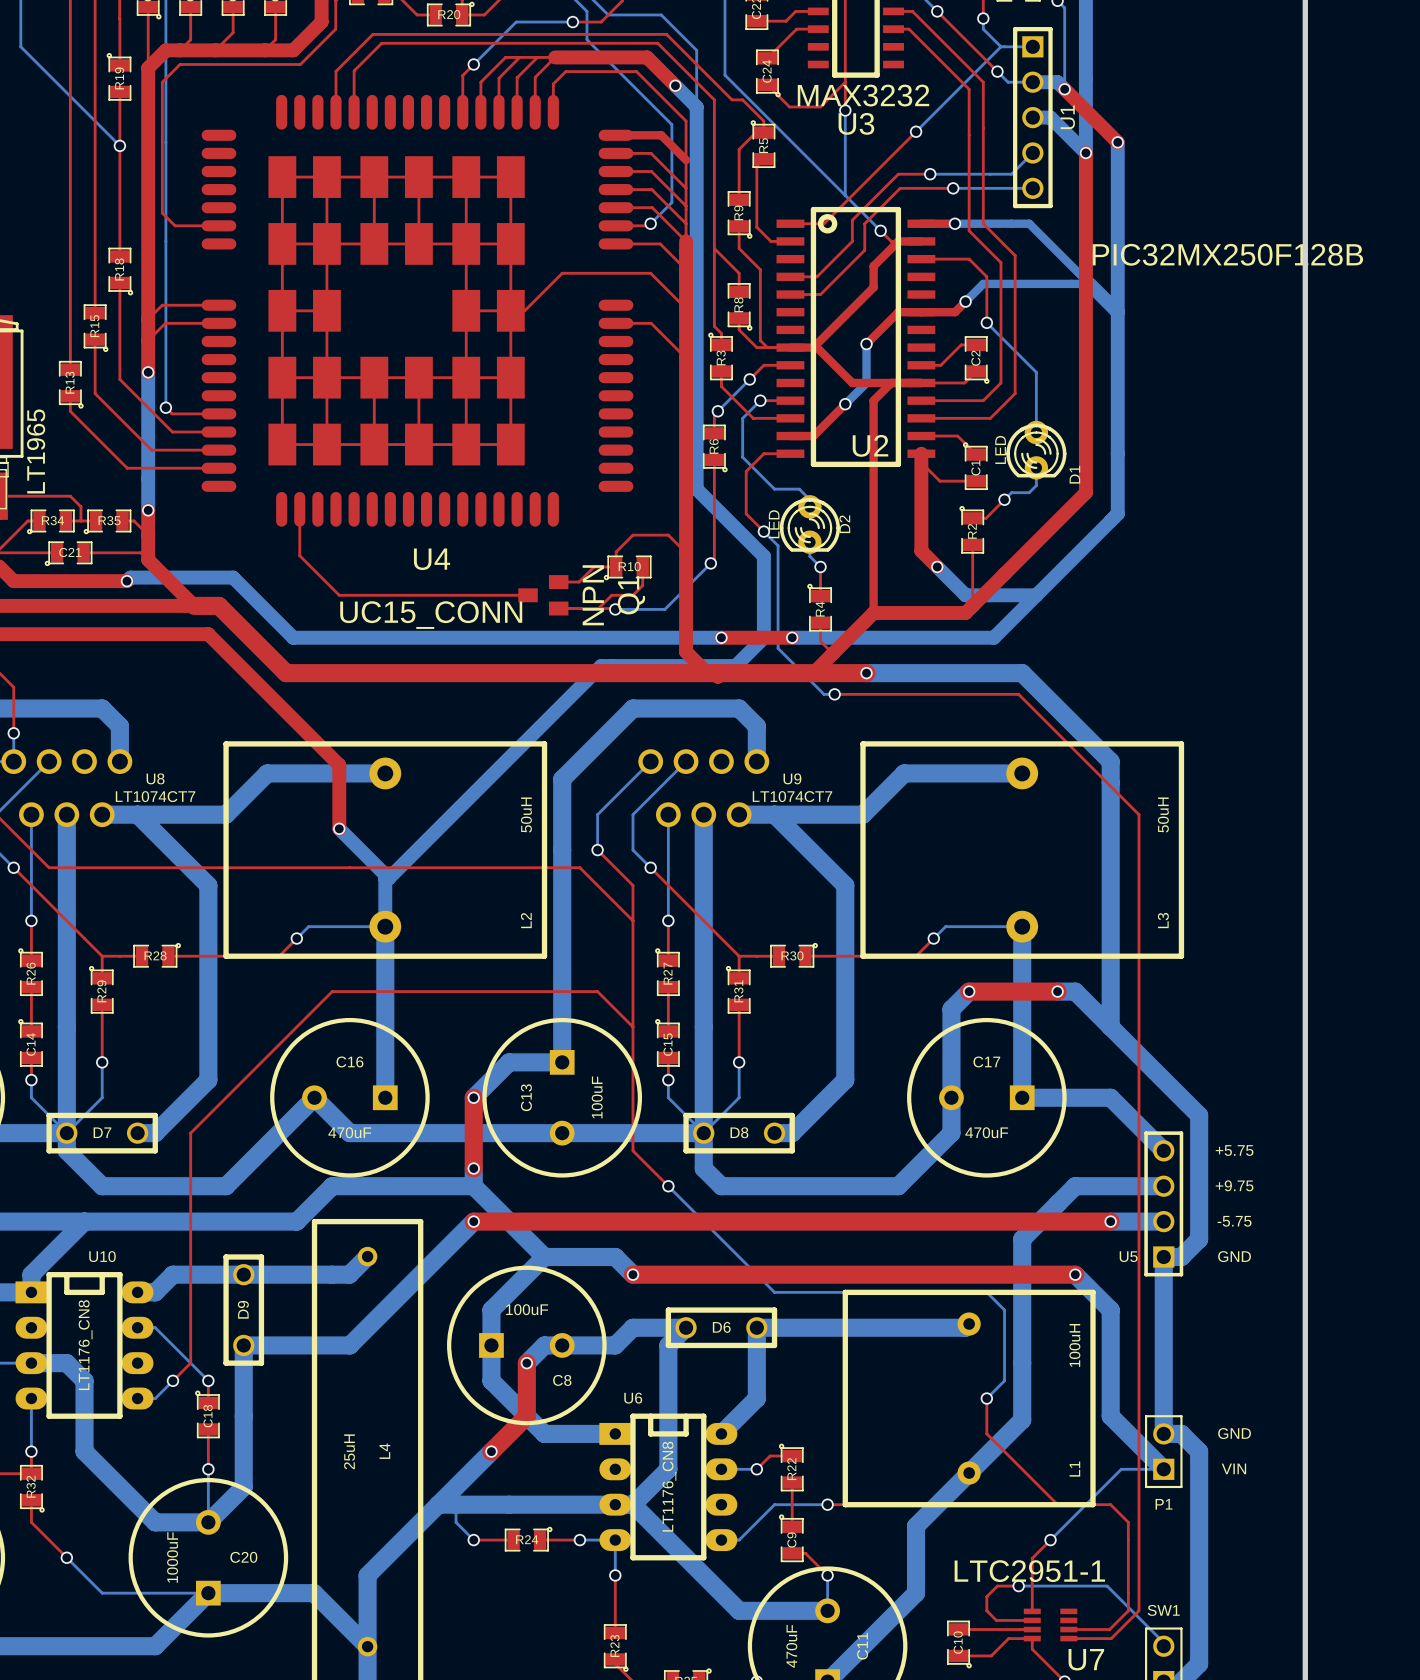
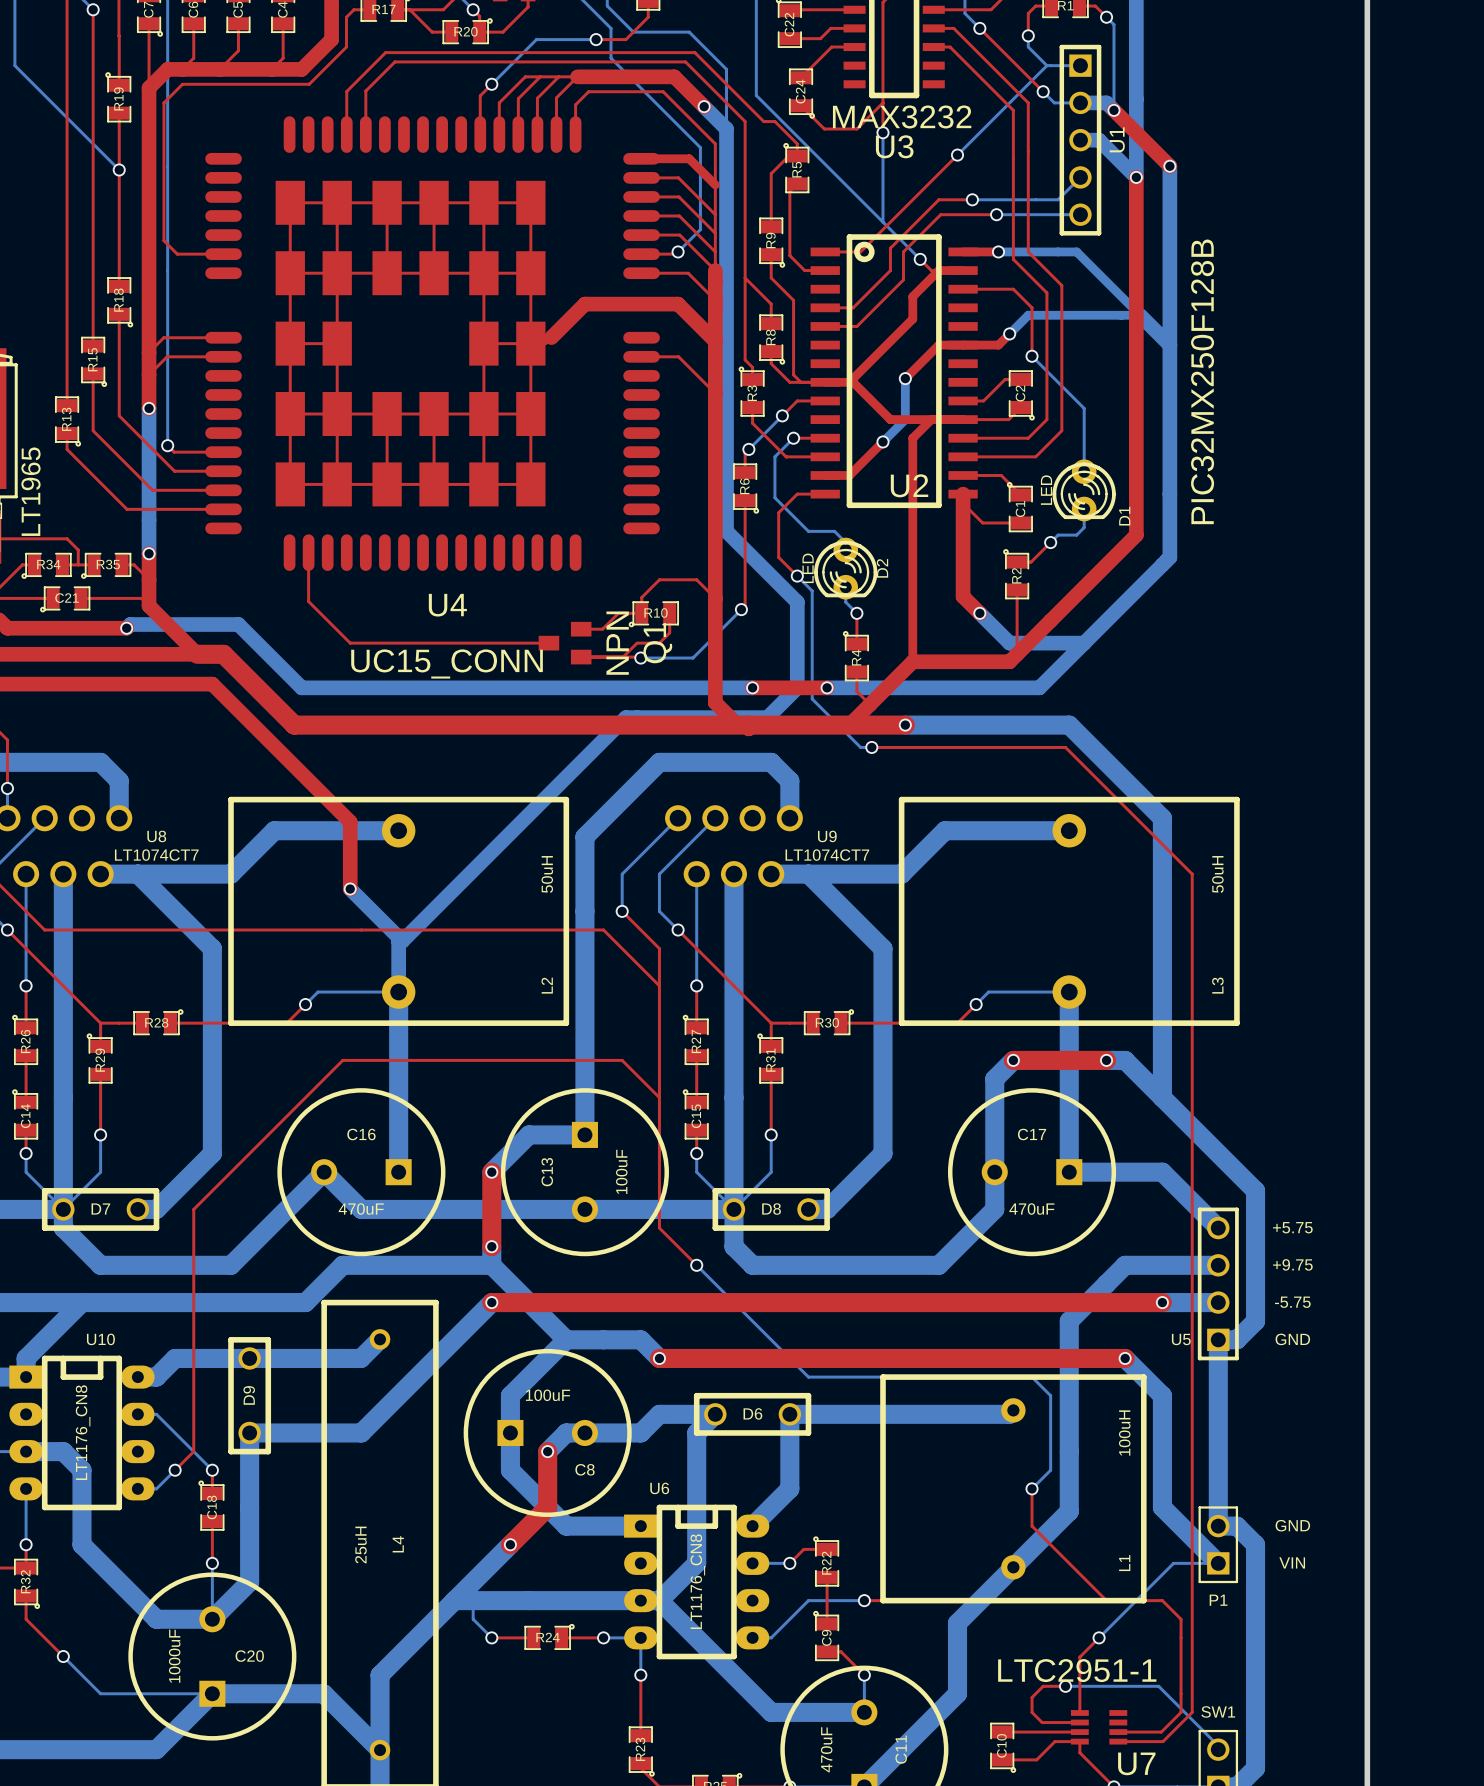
U2 value rotation: 0° (1227, 254) -> 90° counterclockwise (1202, 381)
top track width: thin (530, 305) (562, 273) (650, 273) (686, 308) -> thick (551, 337) (584, 304) (678, 304) (715, 341)

